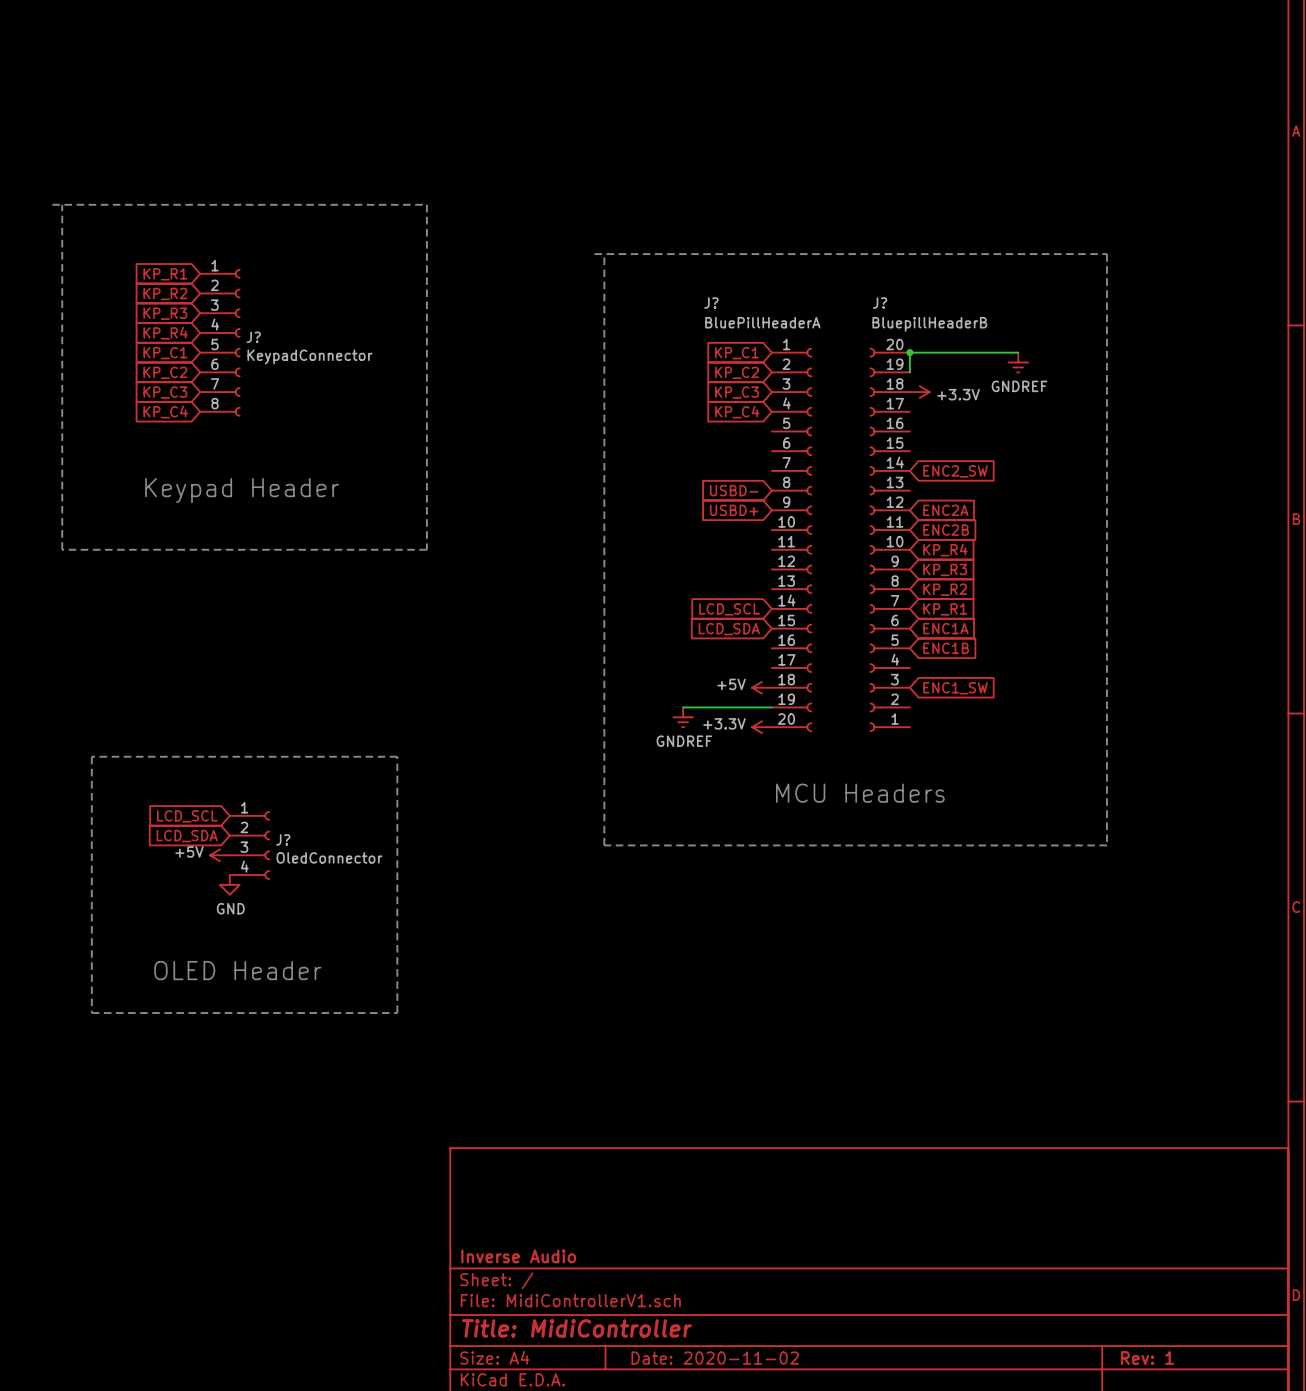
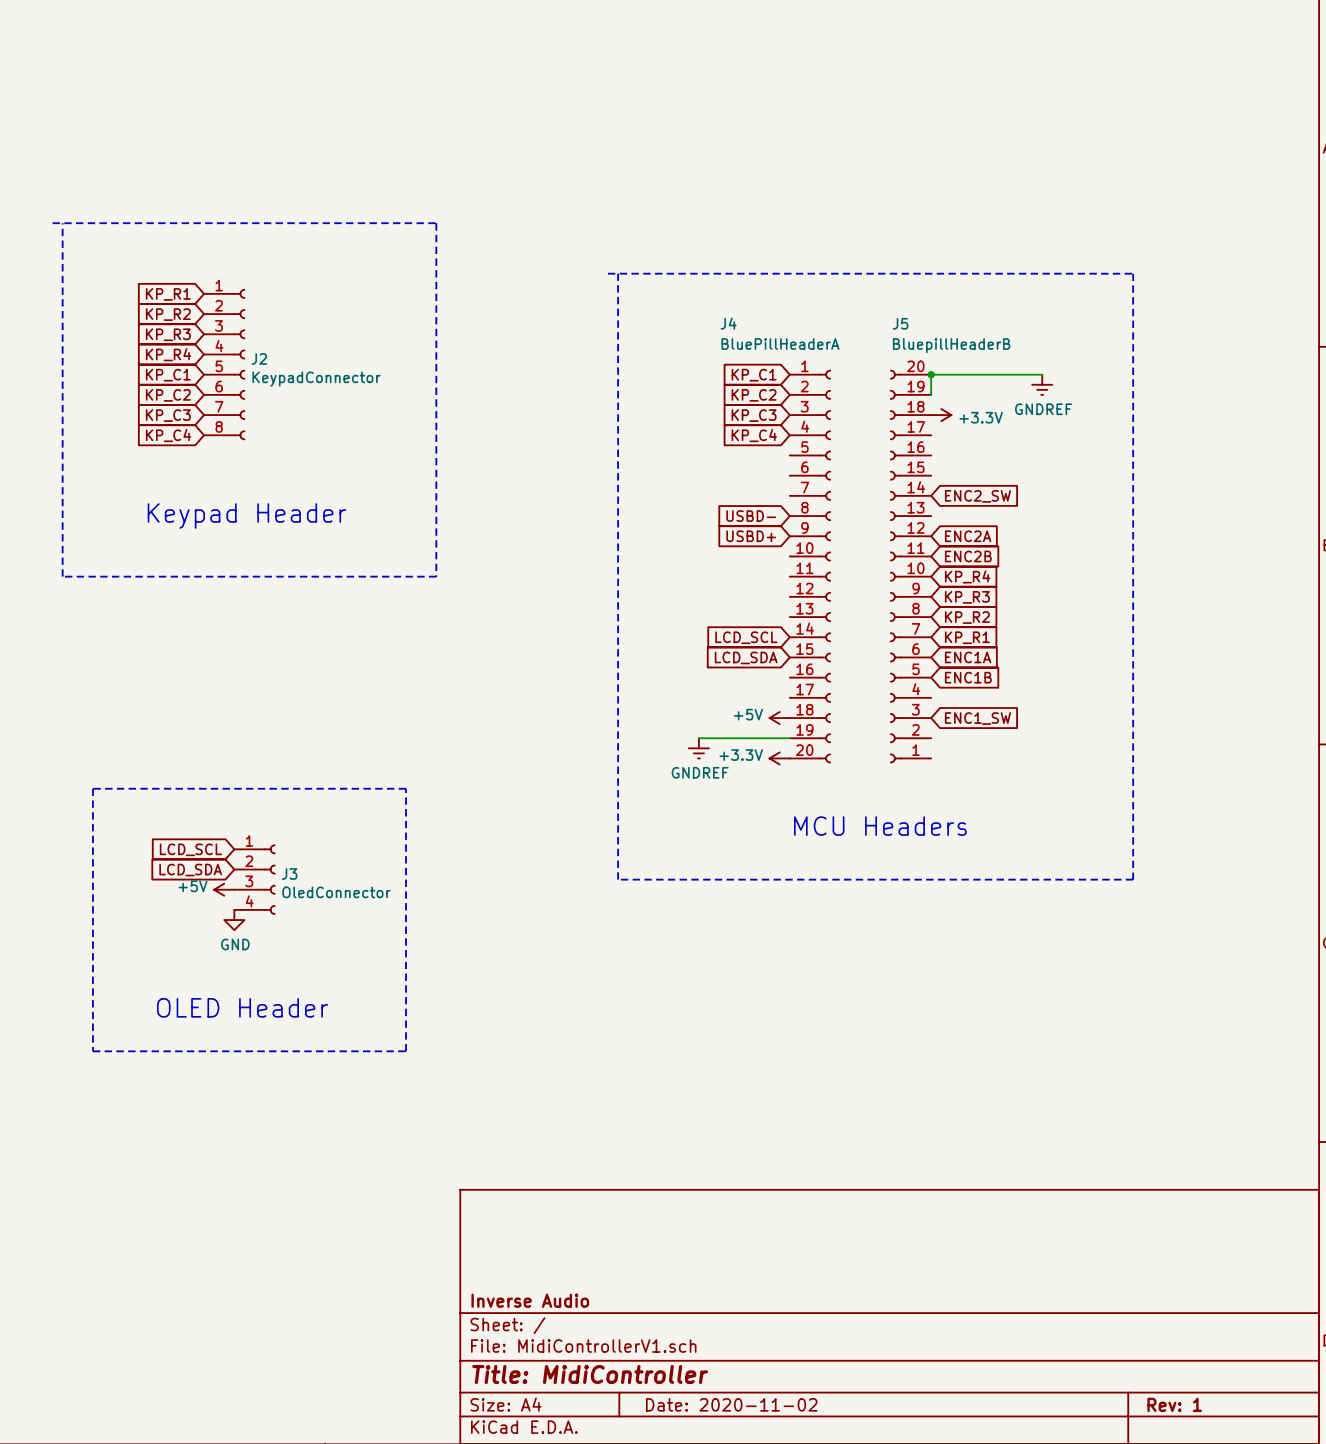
J? name: J? (711, 302) -> J4 (728, 323)
J? name: J? (880, 302) -> J5 (900, 323)
J? name: J? (253, 337) -> J2 (259, 358)
J? name: J? (283, 839) -> J3 (289, 874)

